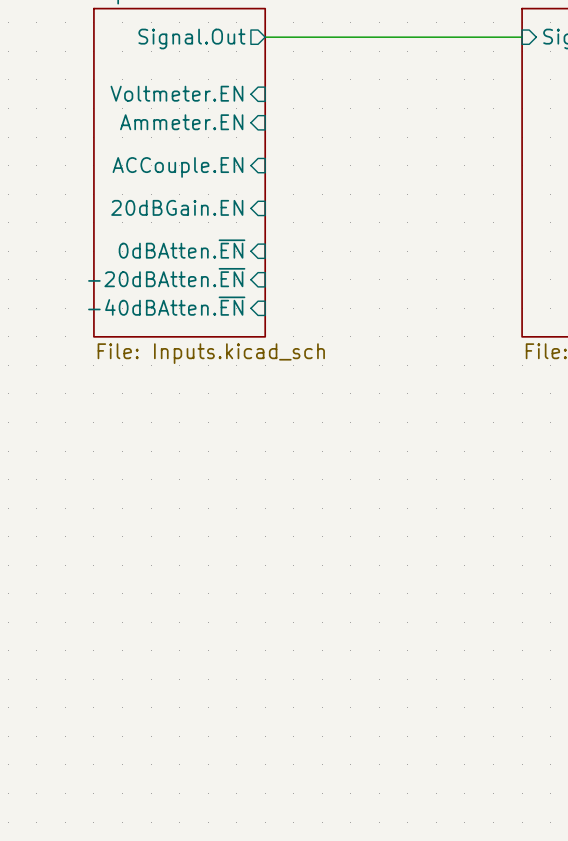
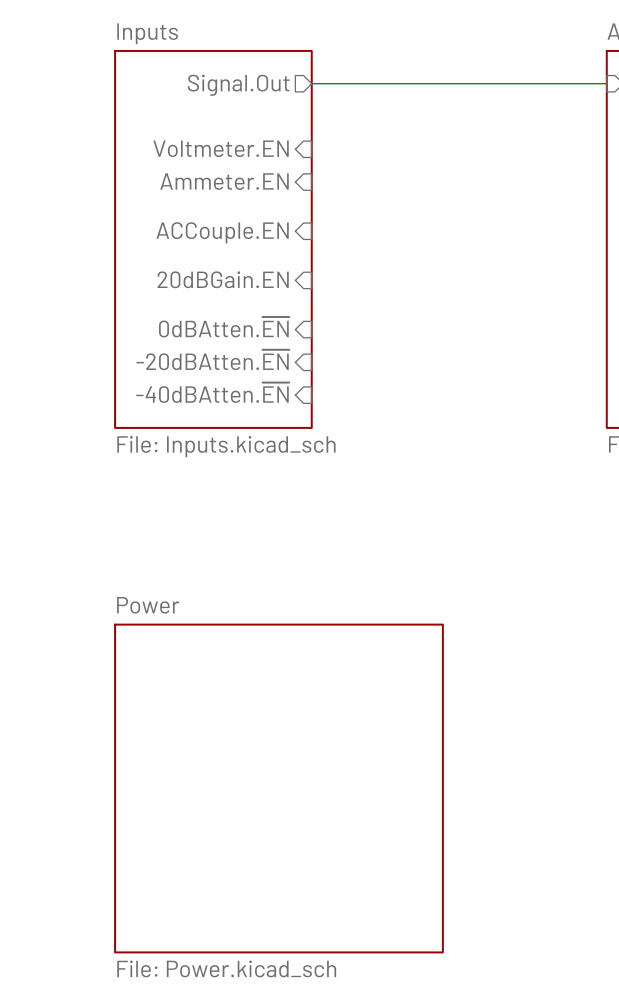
sheet Power: none -> File: Power.kicad_sch (278, 788)

